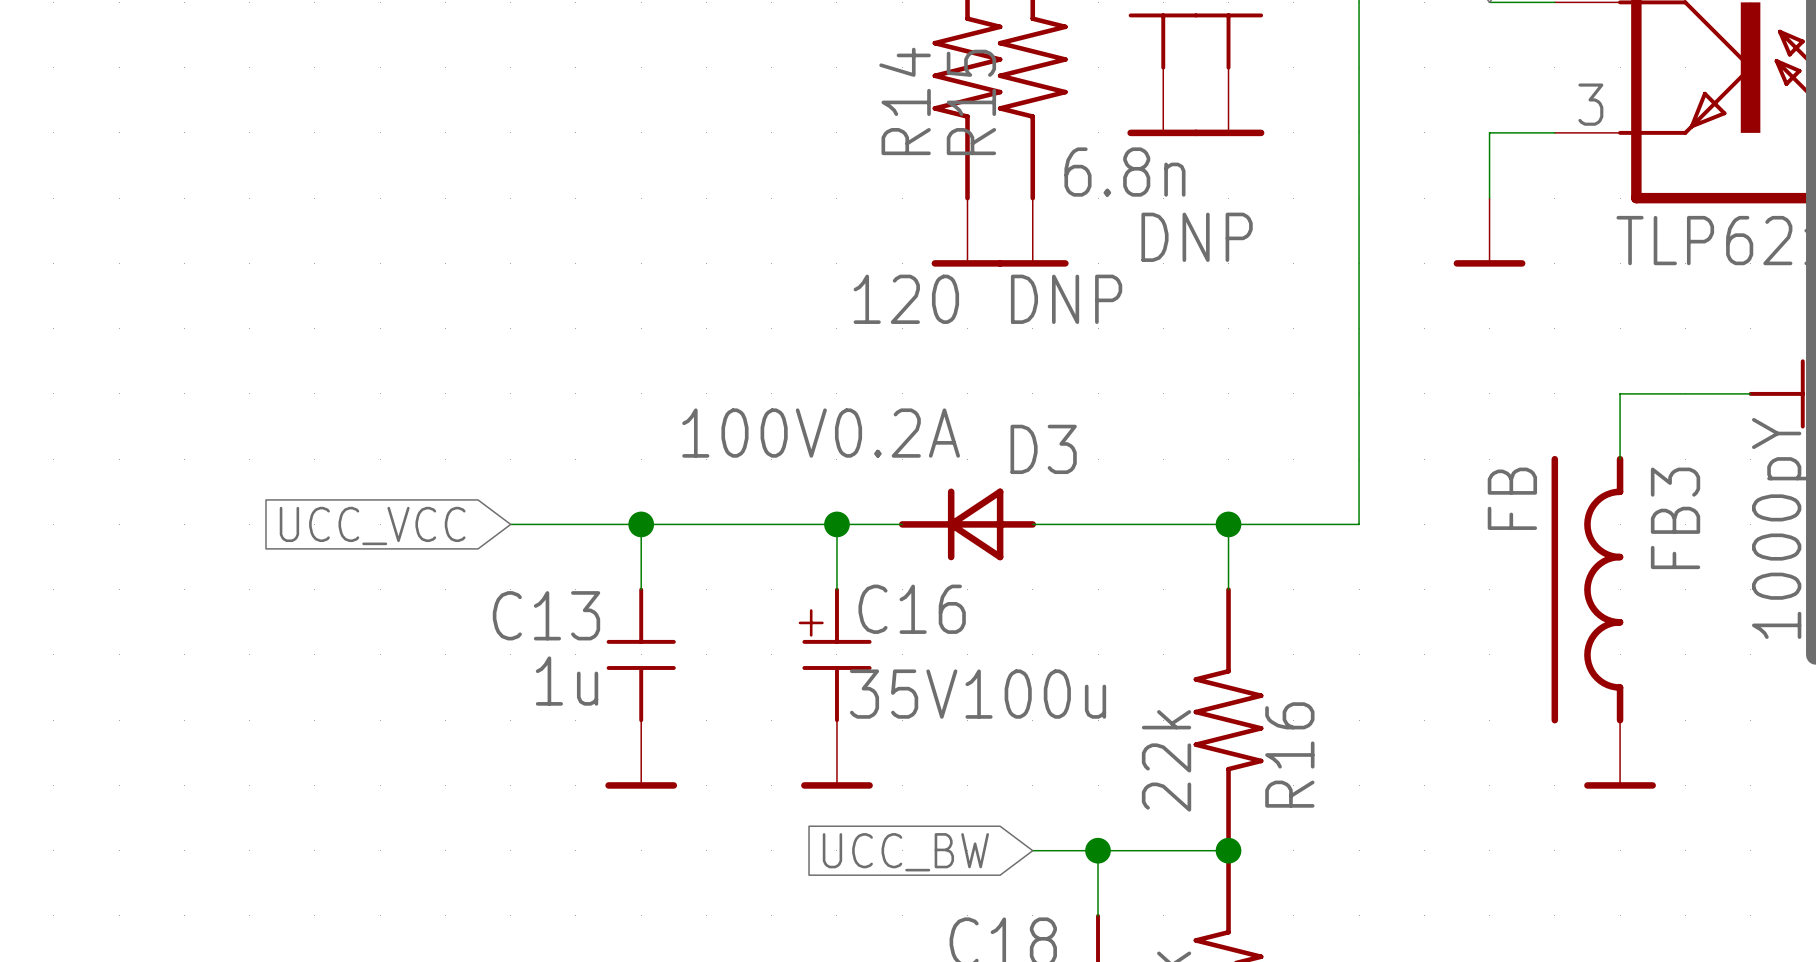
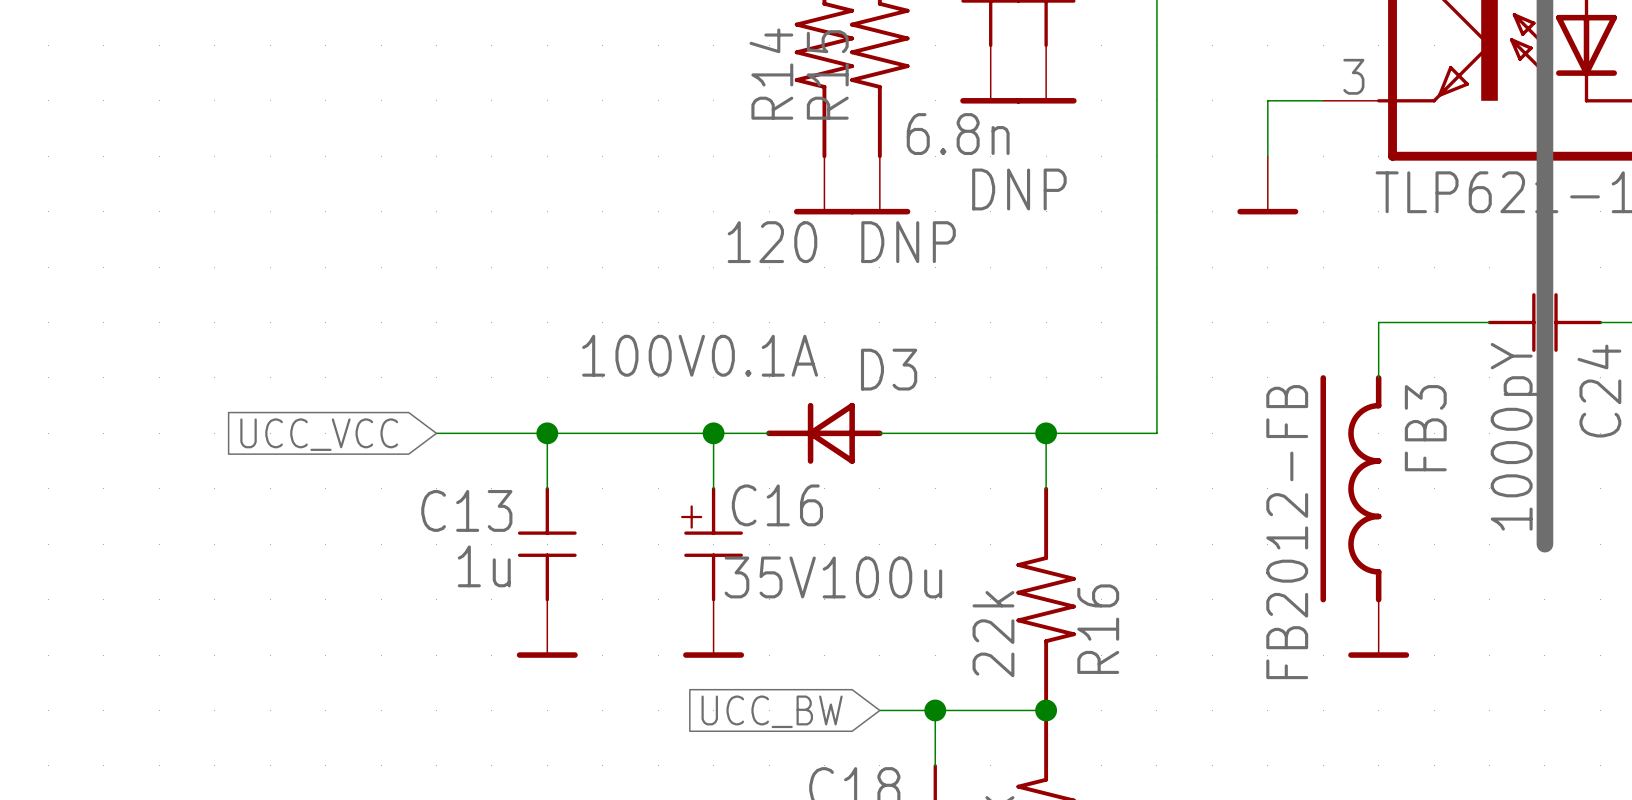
D3 value: 100V0.2A (821, 433) -> 100V0.1A (700, 355)
FB3 value: FB (1512, 498) -> FB2012-FB (1287, 532)

